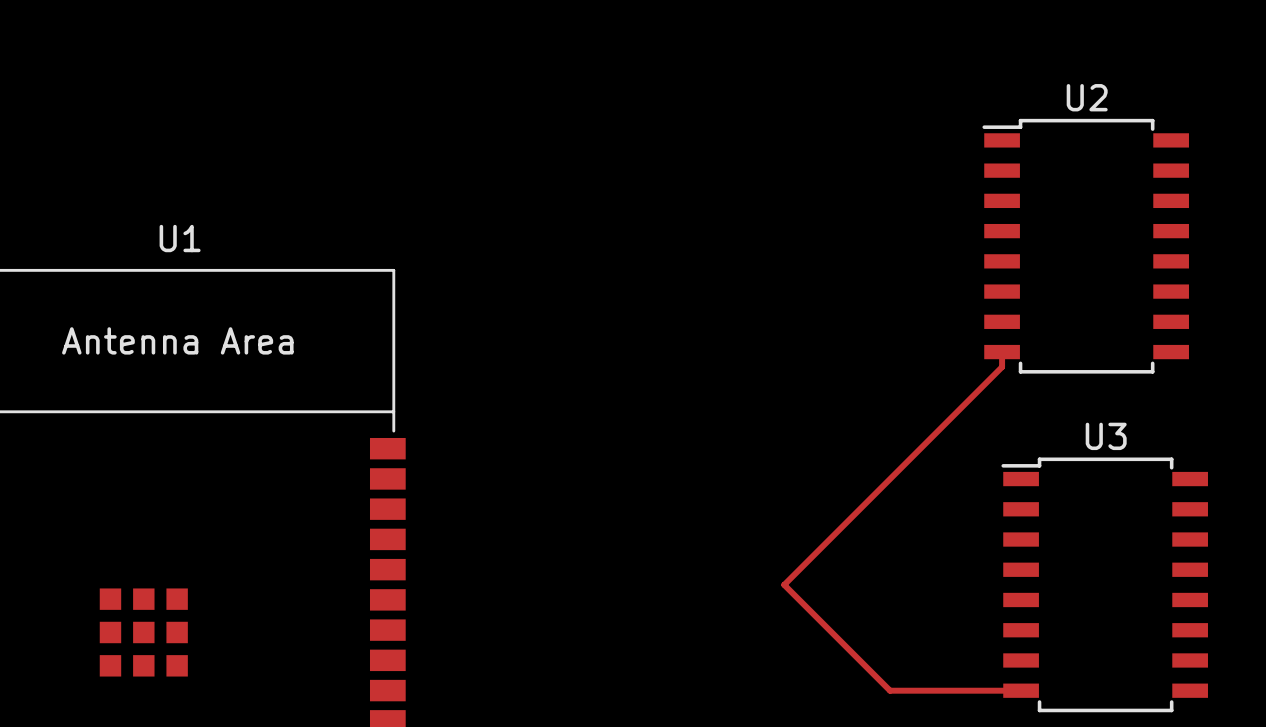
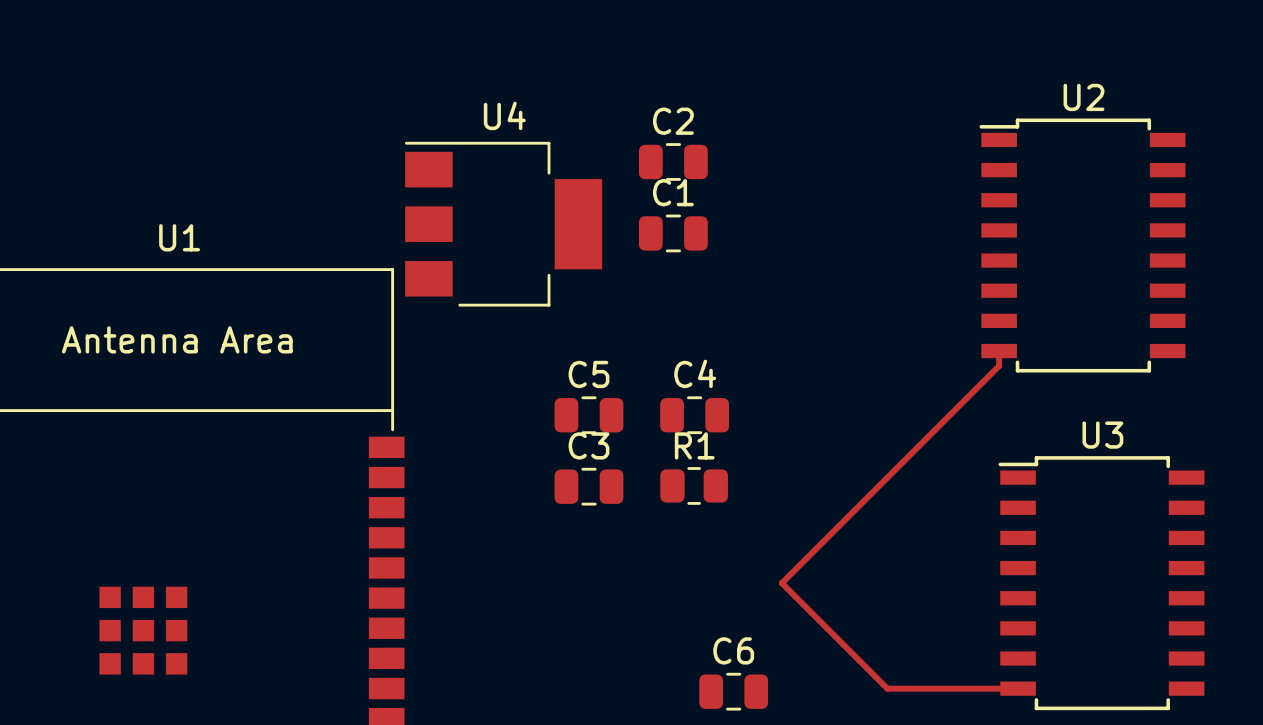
C2: none -> (673, 161)
U4: none -> (503, 224)
C1: none -> (673, 233)
C5: none -> (588, 415)
C4: none -> (694, 415)
R1: none -> (694, 485)
C3: none -> (588, 486)
C6: none -> (733, 691)

